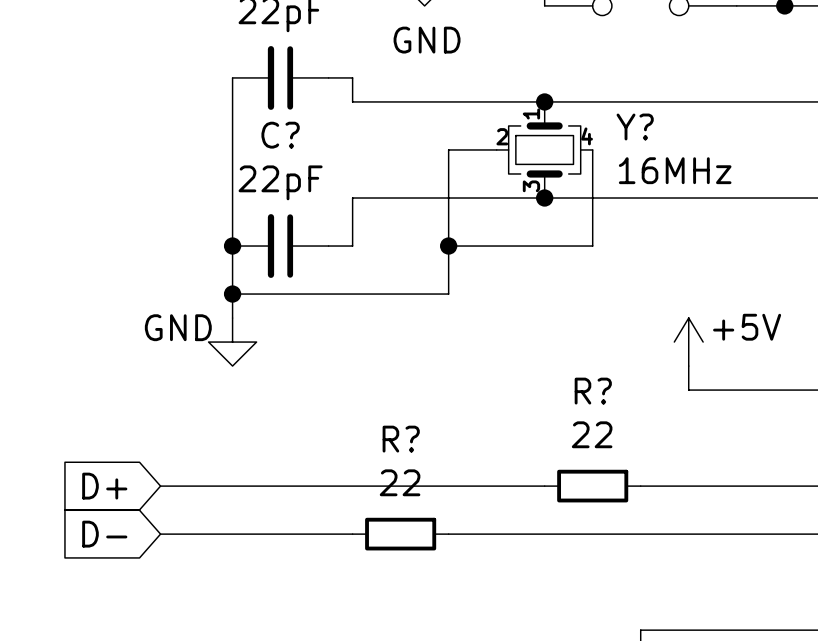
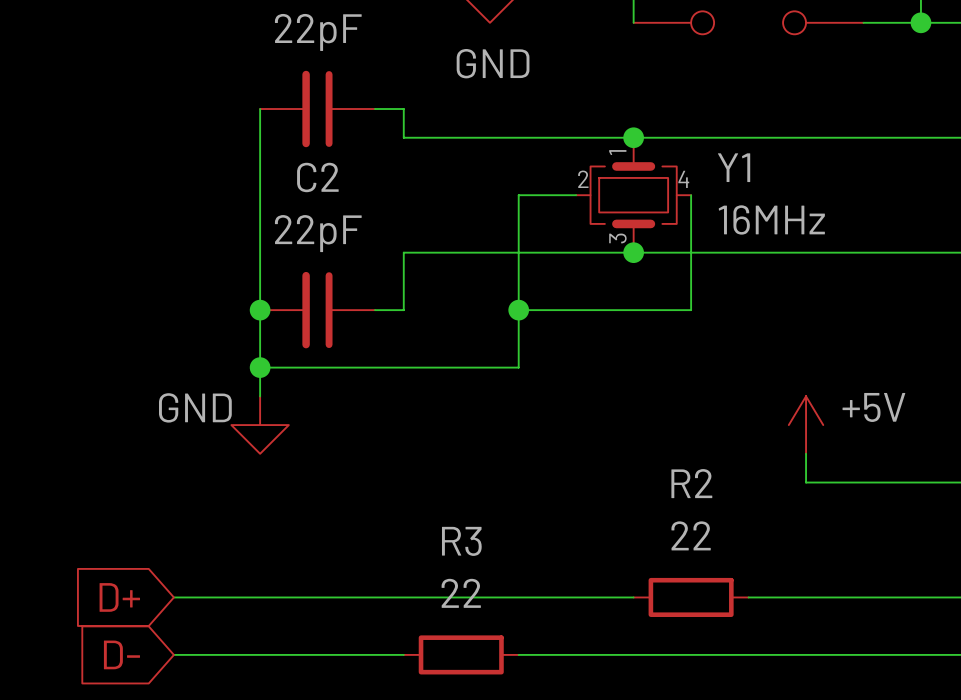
Y? name: Y? (635, 127) -> Y1 (734, 167)
C? name: C? (280, 135) -> C2 (317, 177)
R? name: R? (593, 391) -> R2 (691, 483)
R? name: R? (401, 439) -> R3 (461, 541)

